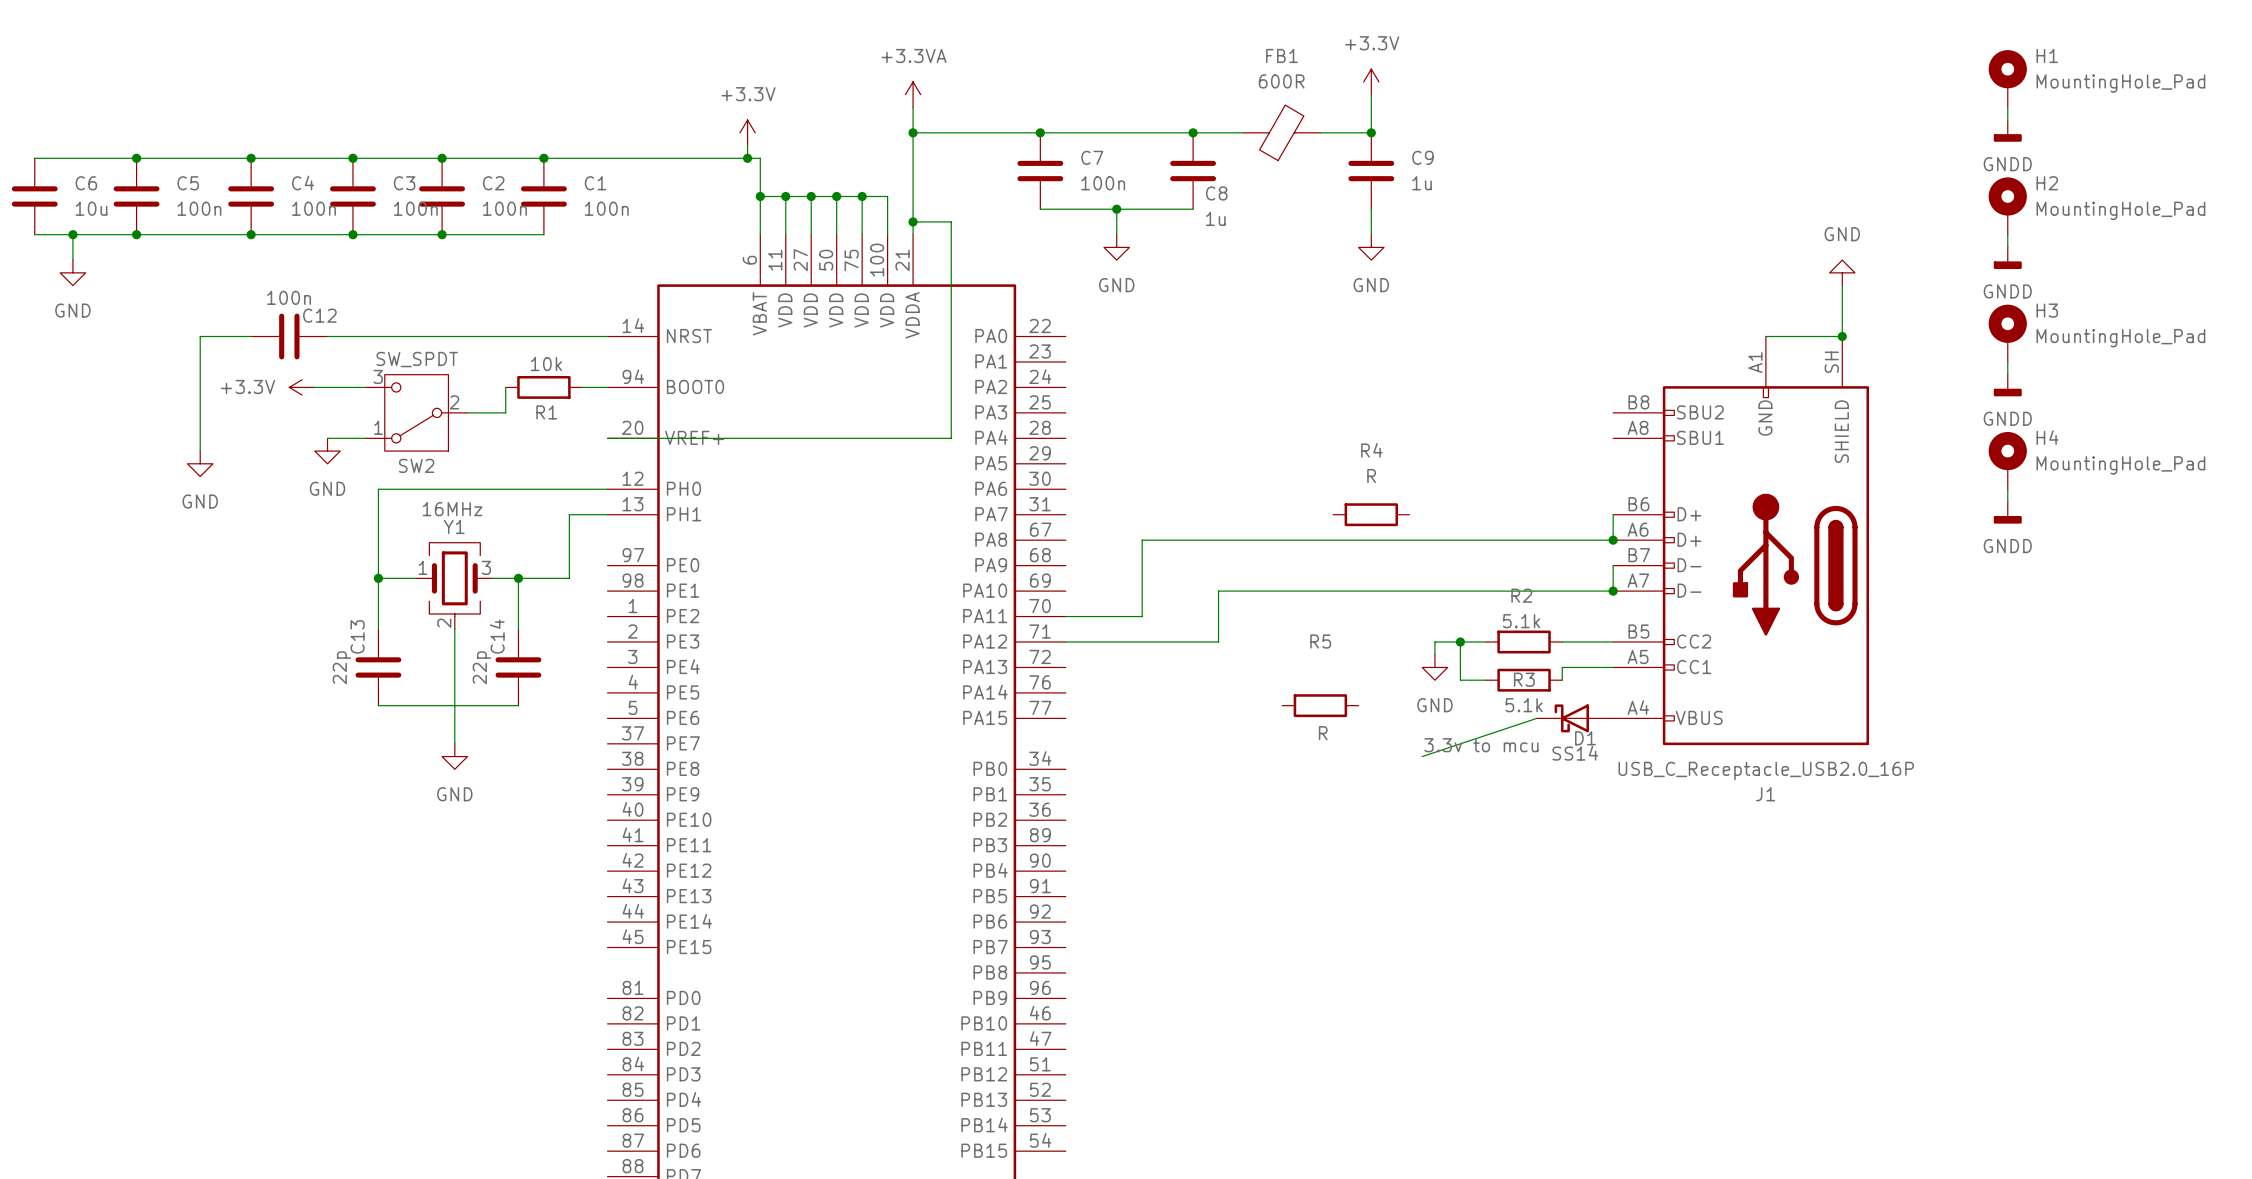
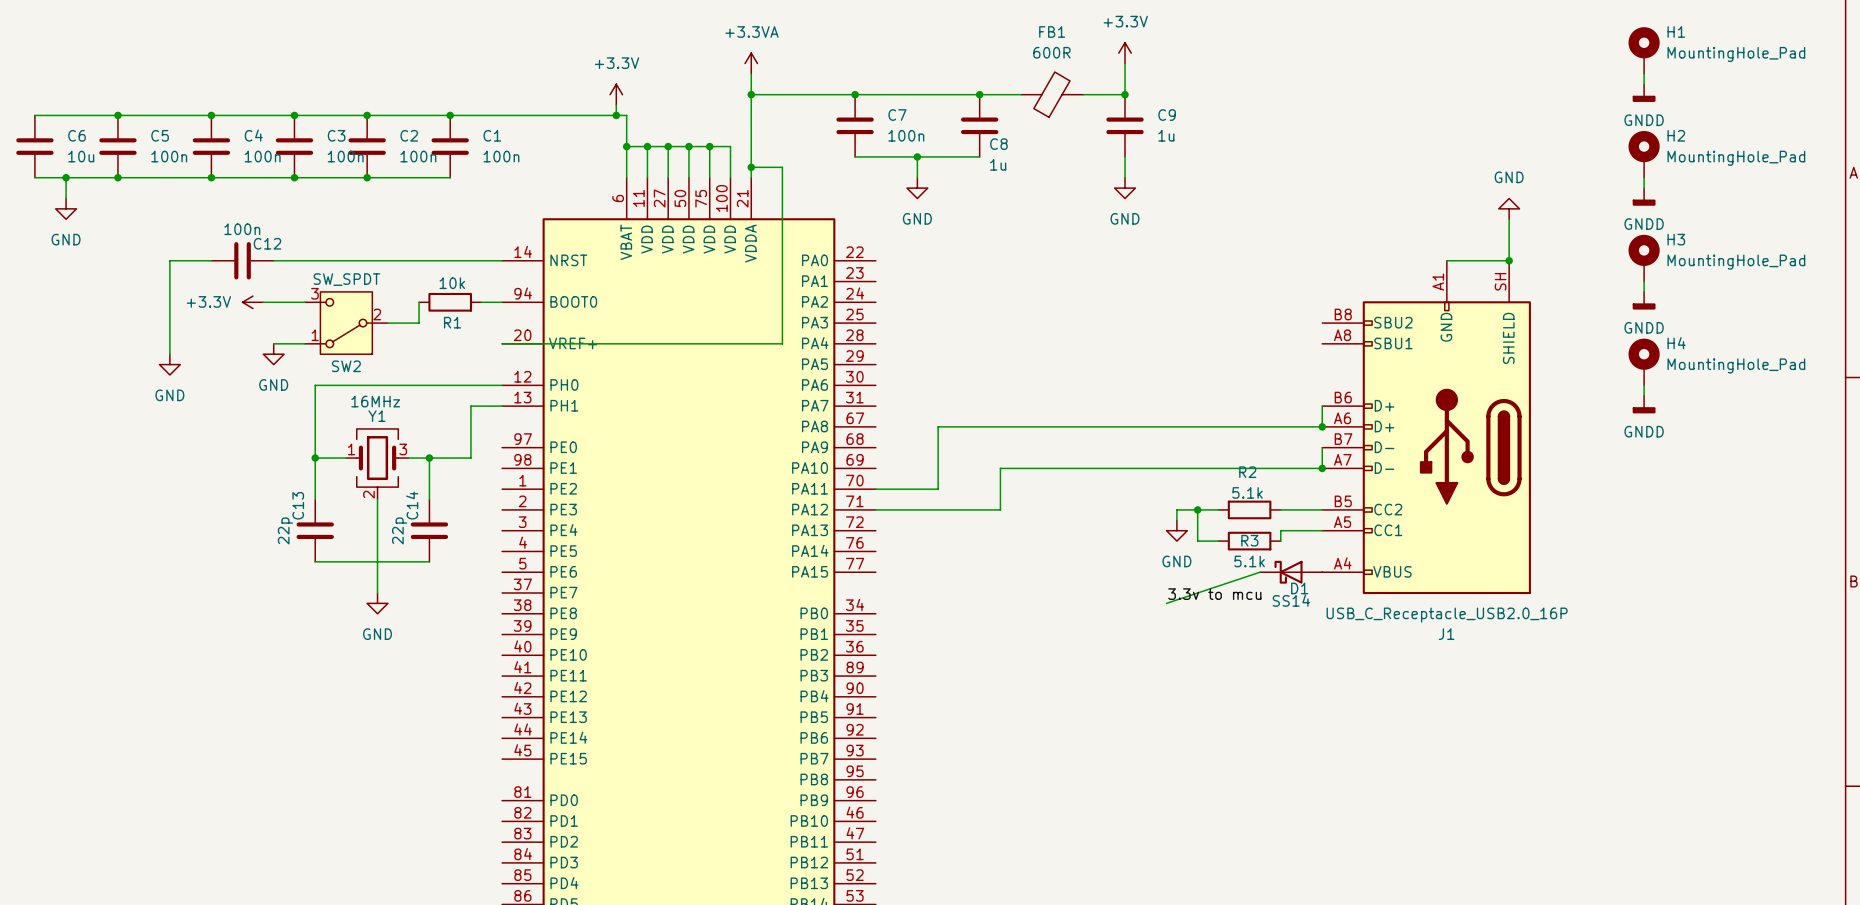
R4: R (1371, 514) -> none
R5: R (1320, 705) -> none

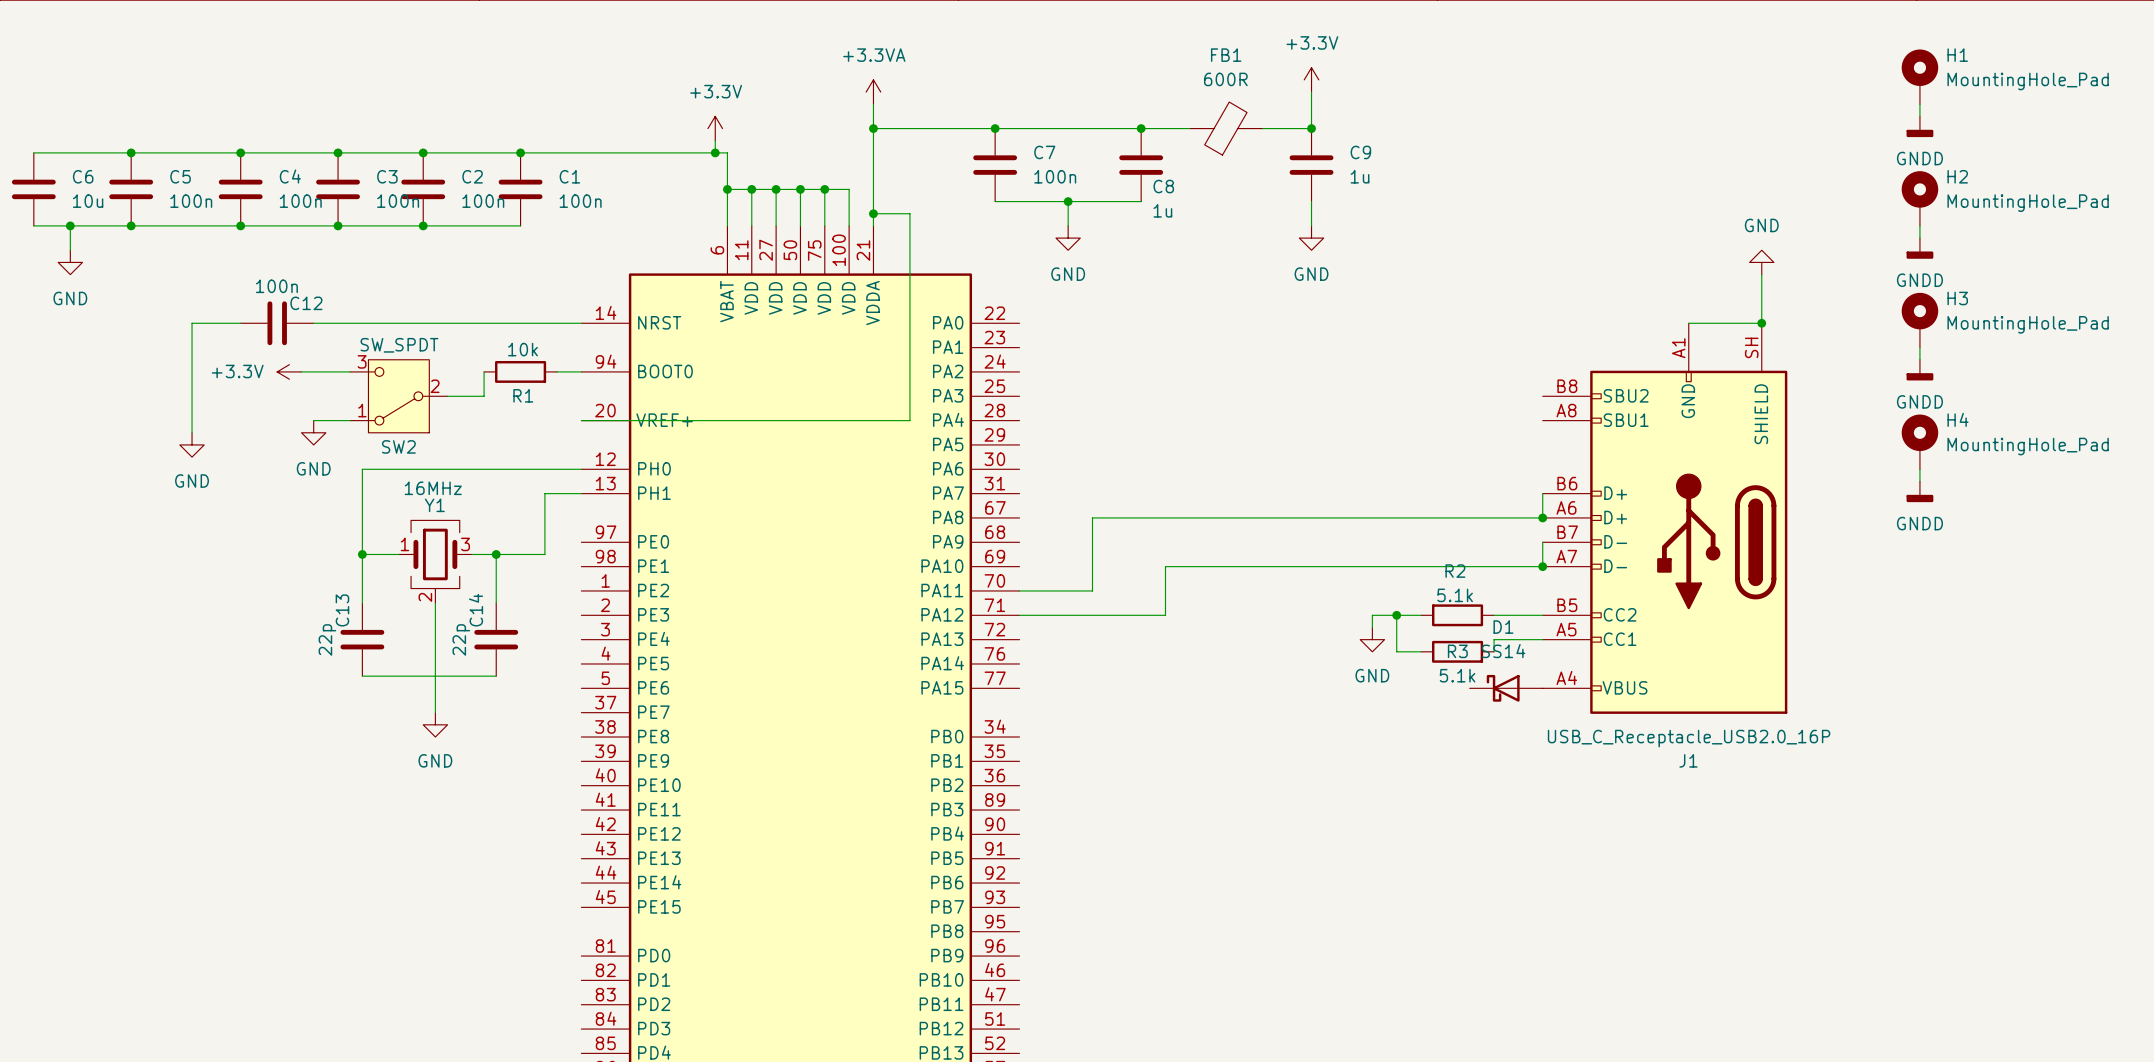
wire: (1259, 572) (1166, 603) -> none
D1 name position: D1 (1299, 588) -> D1 (1503, 627)
label: 3.3v to mcu (1214, 594) -> none
D1 value position: SS14 (1291, 600) -> SS14 (1503, 651)

